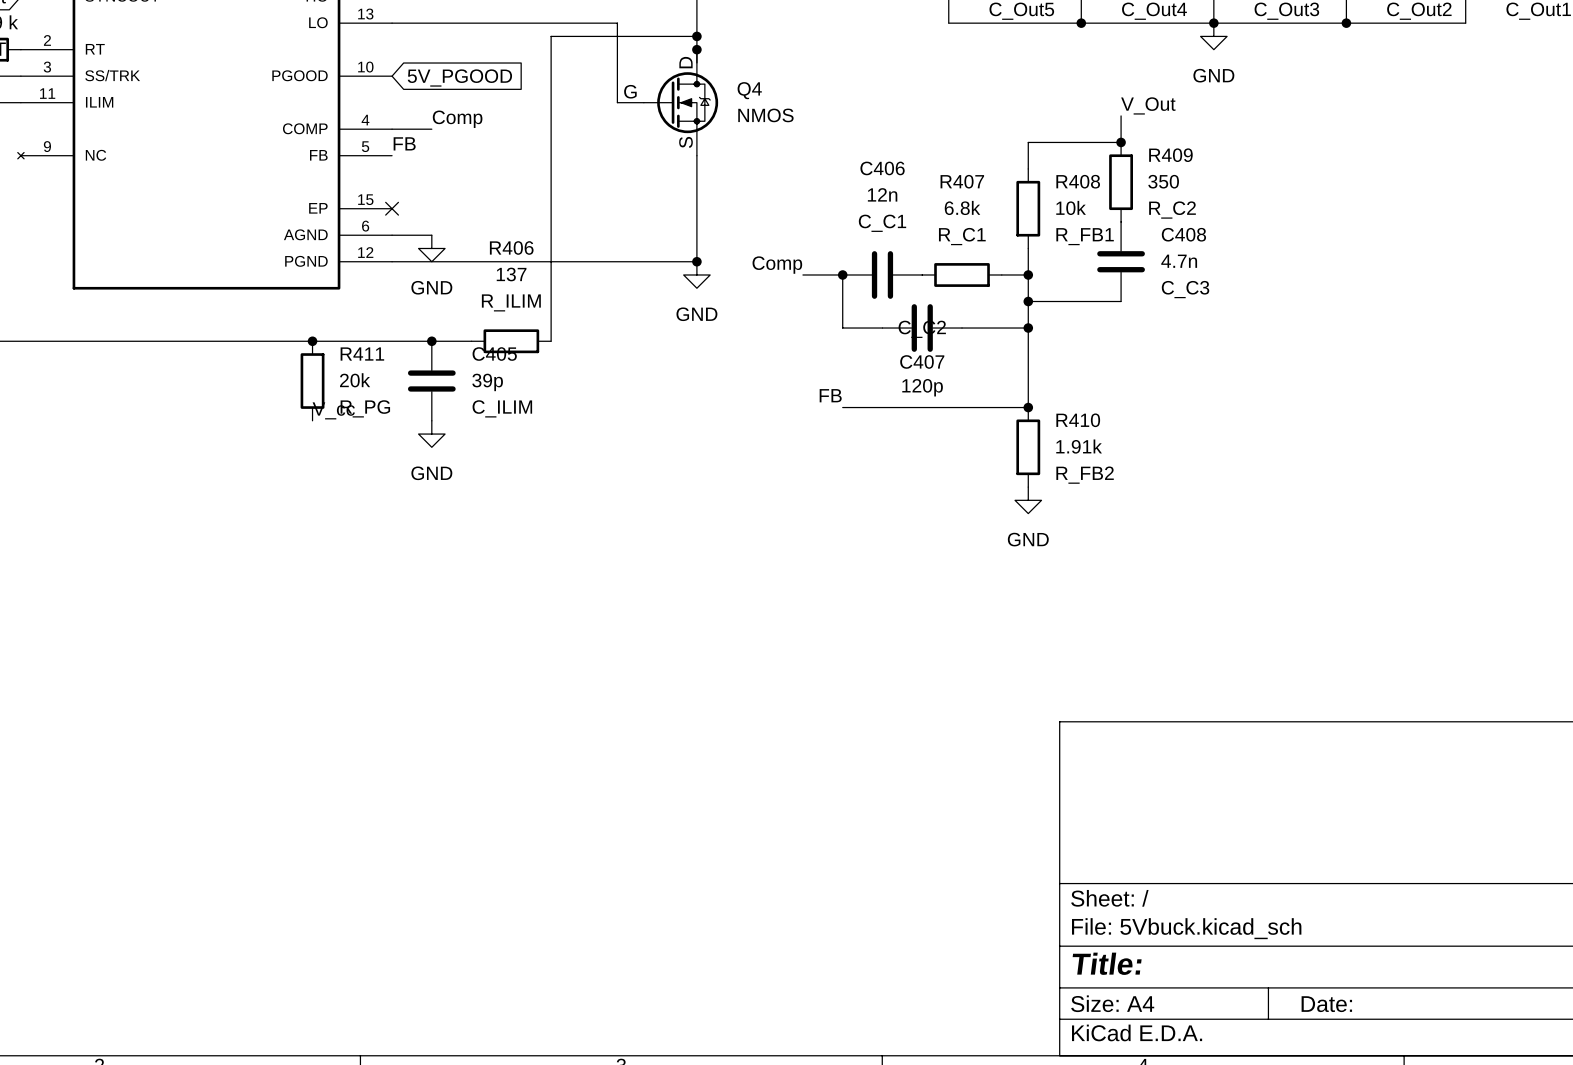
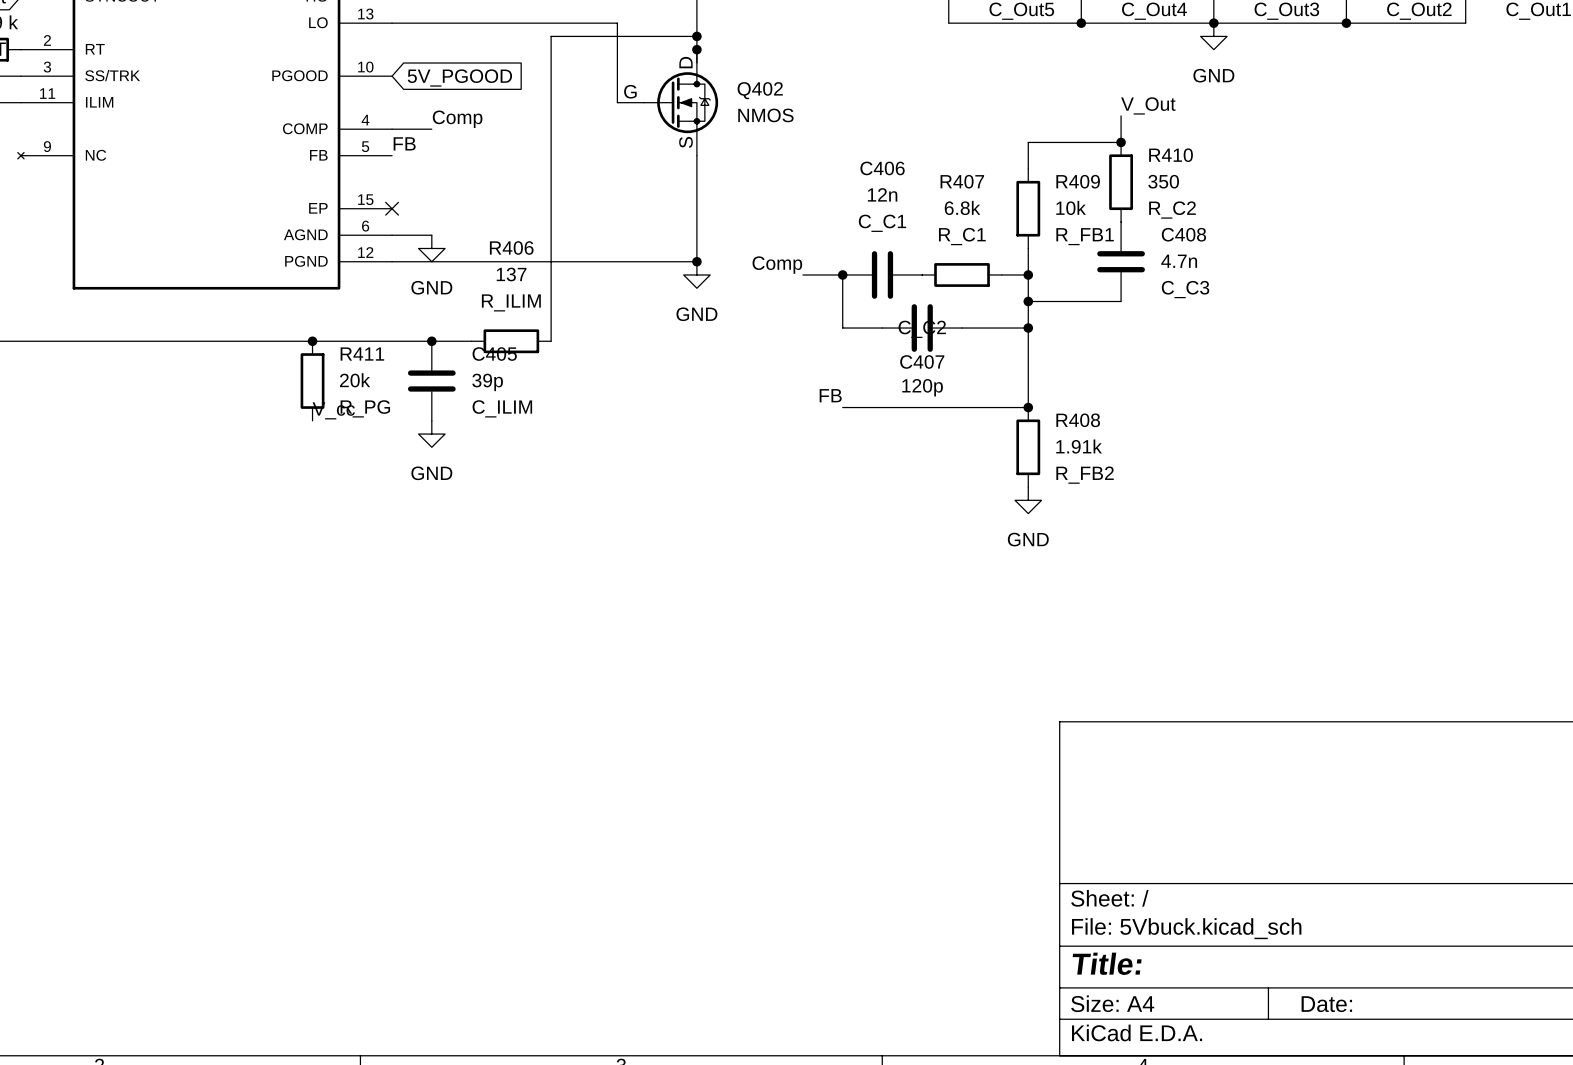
Q4 name: Q4 (749, 90) -> Q402 (760, 90)
R409 name: R409 (1170, 155) -> R410 (1171, 155)
R408 name: R408 (1078, 181) -> R409 (1078, 181)
R410 name: R410 (1078, 420) -> R408 (1078, 420)

